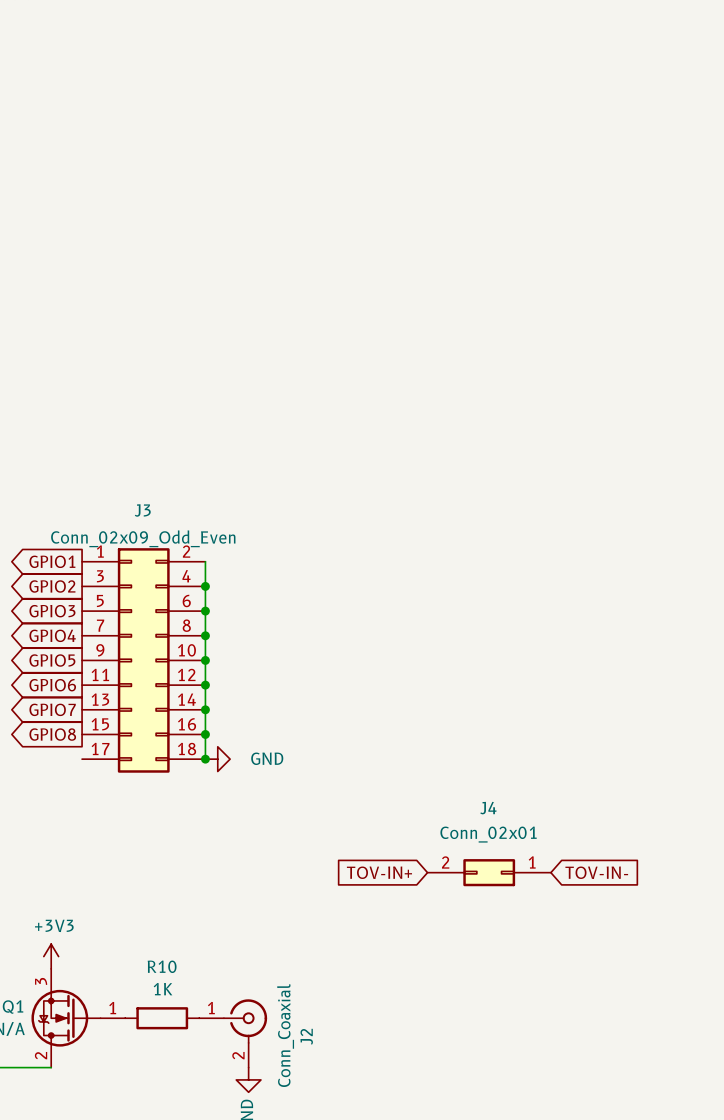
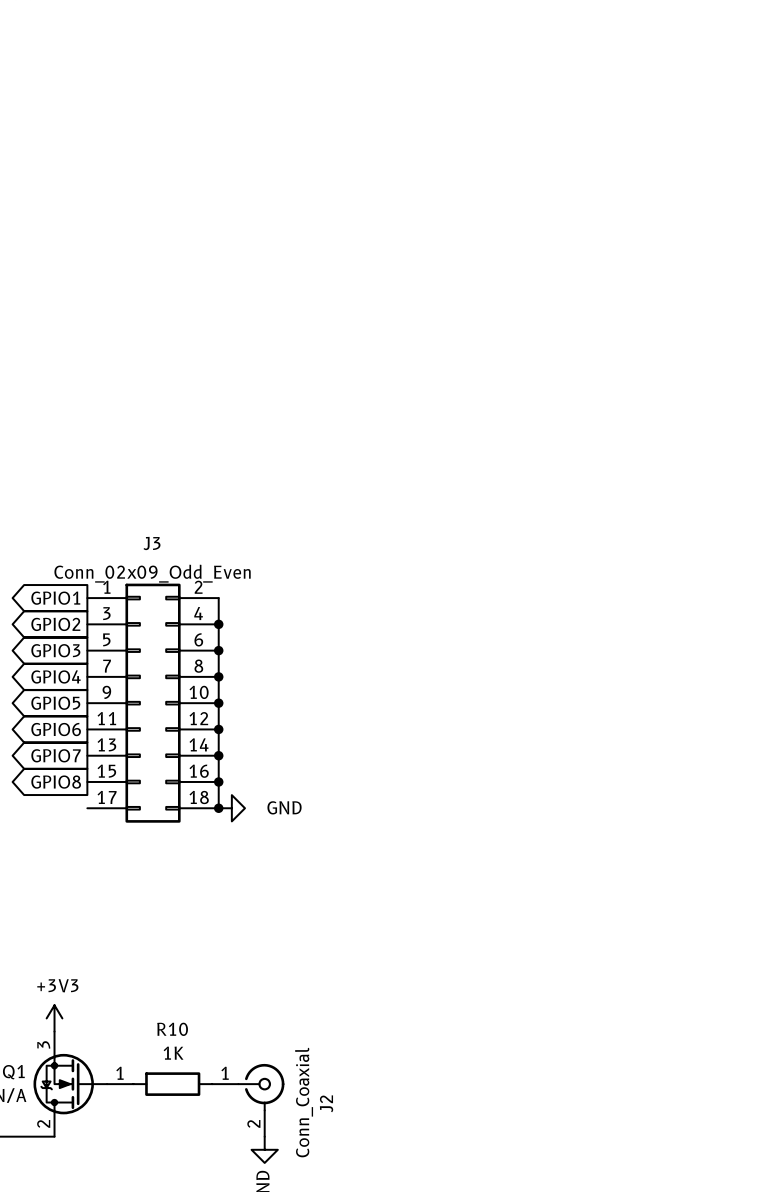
global label: TOV-IN+ (379, 872) -> none
J4: Conn_02x01 (489, 872) -> none
global label: TOV-IN- (596, 872) -> none

